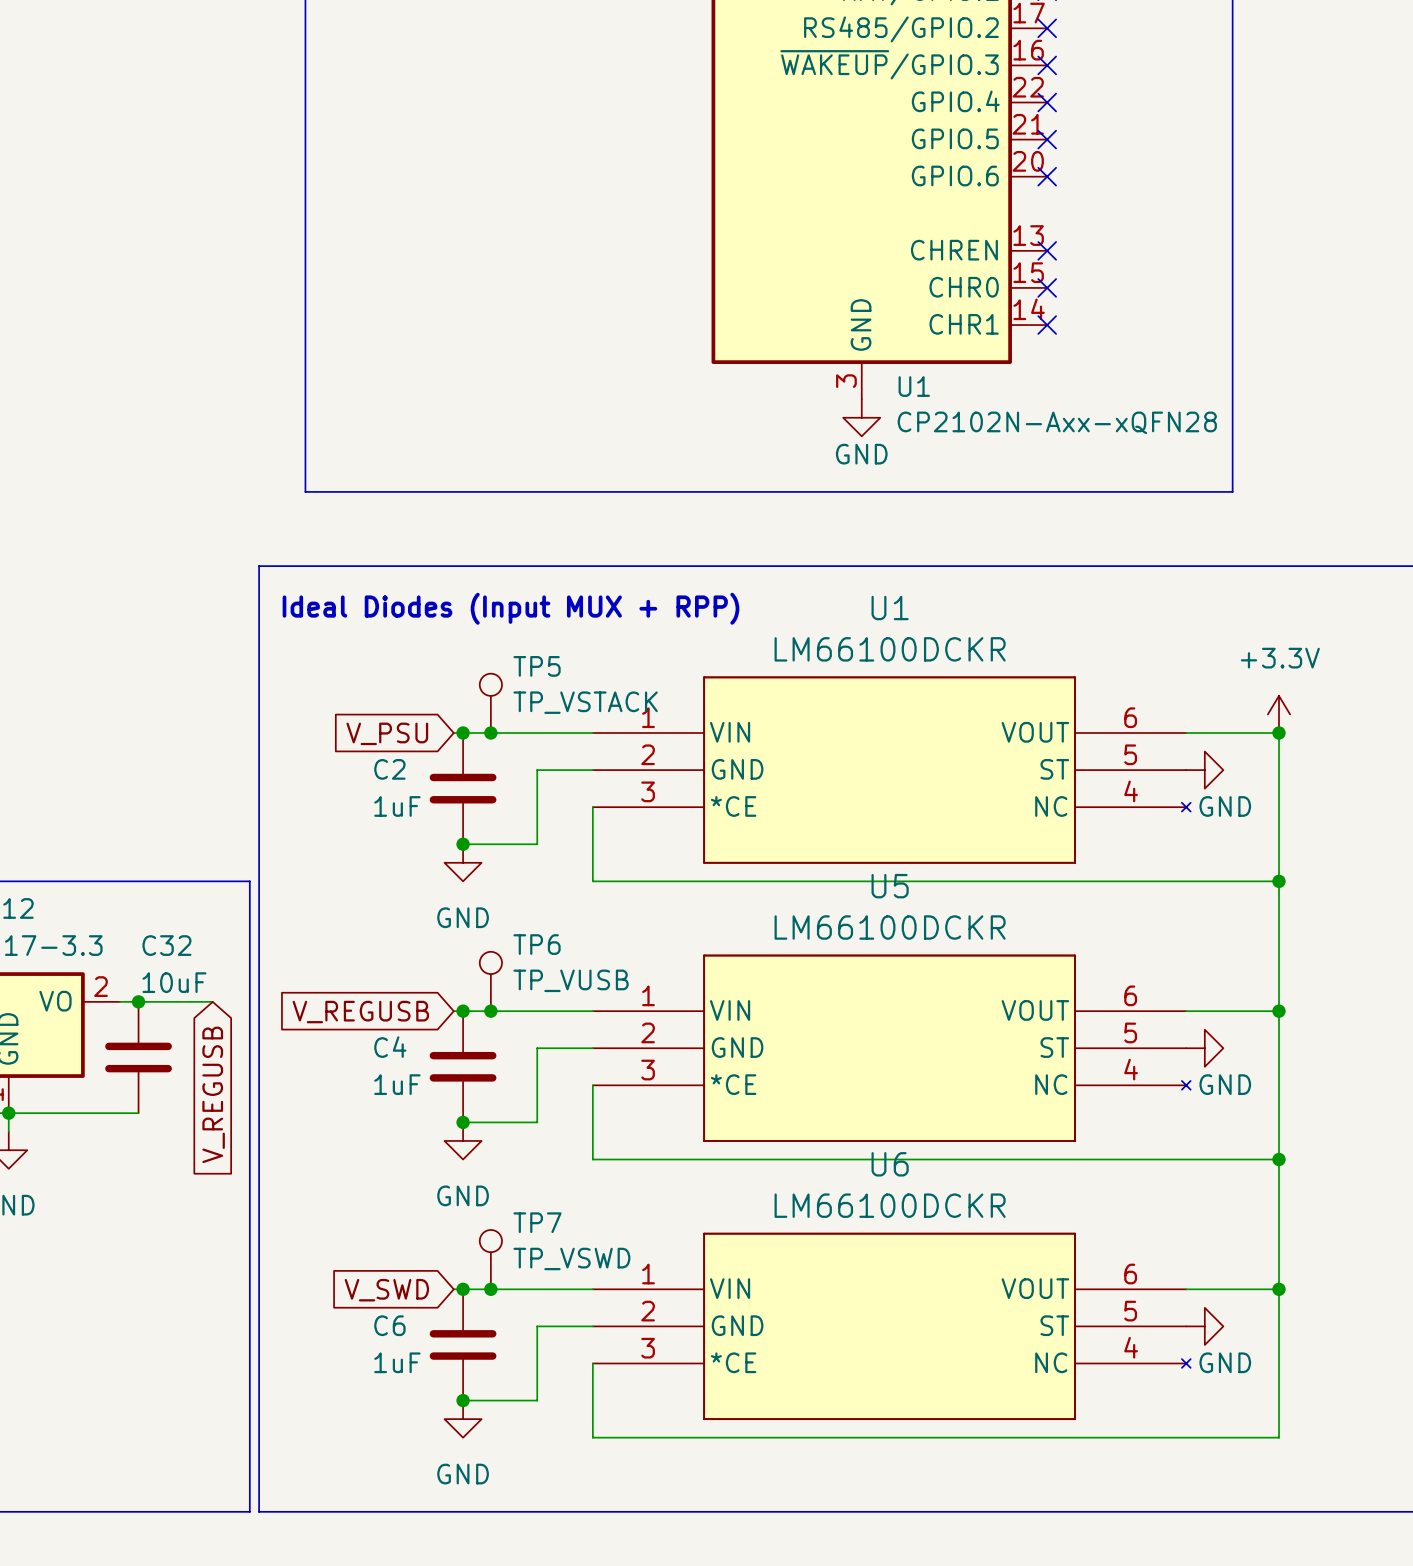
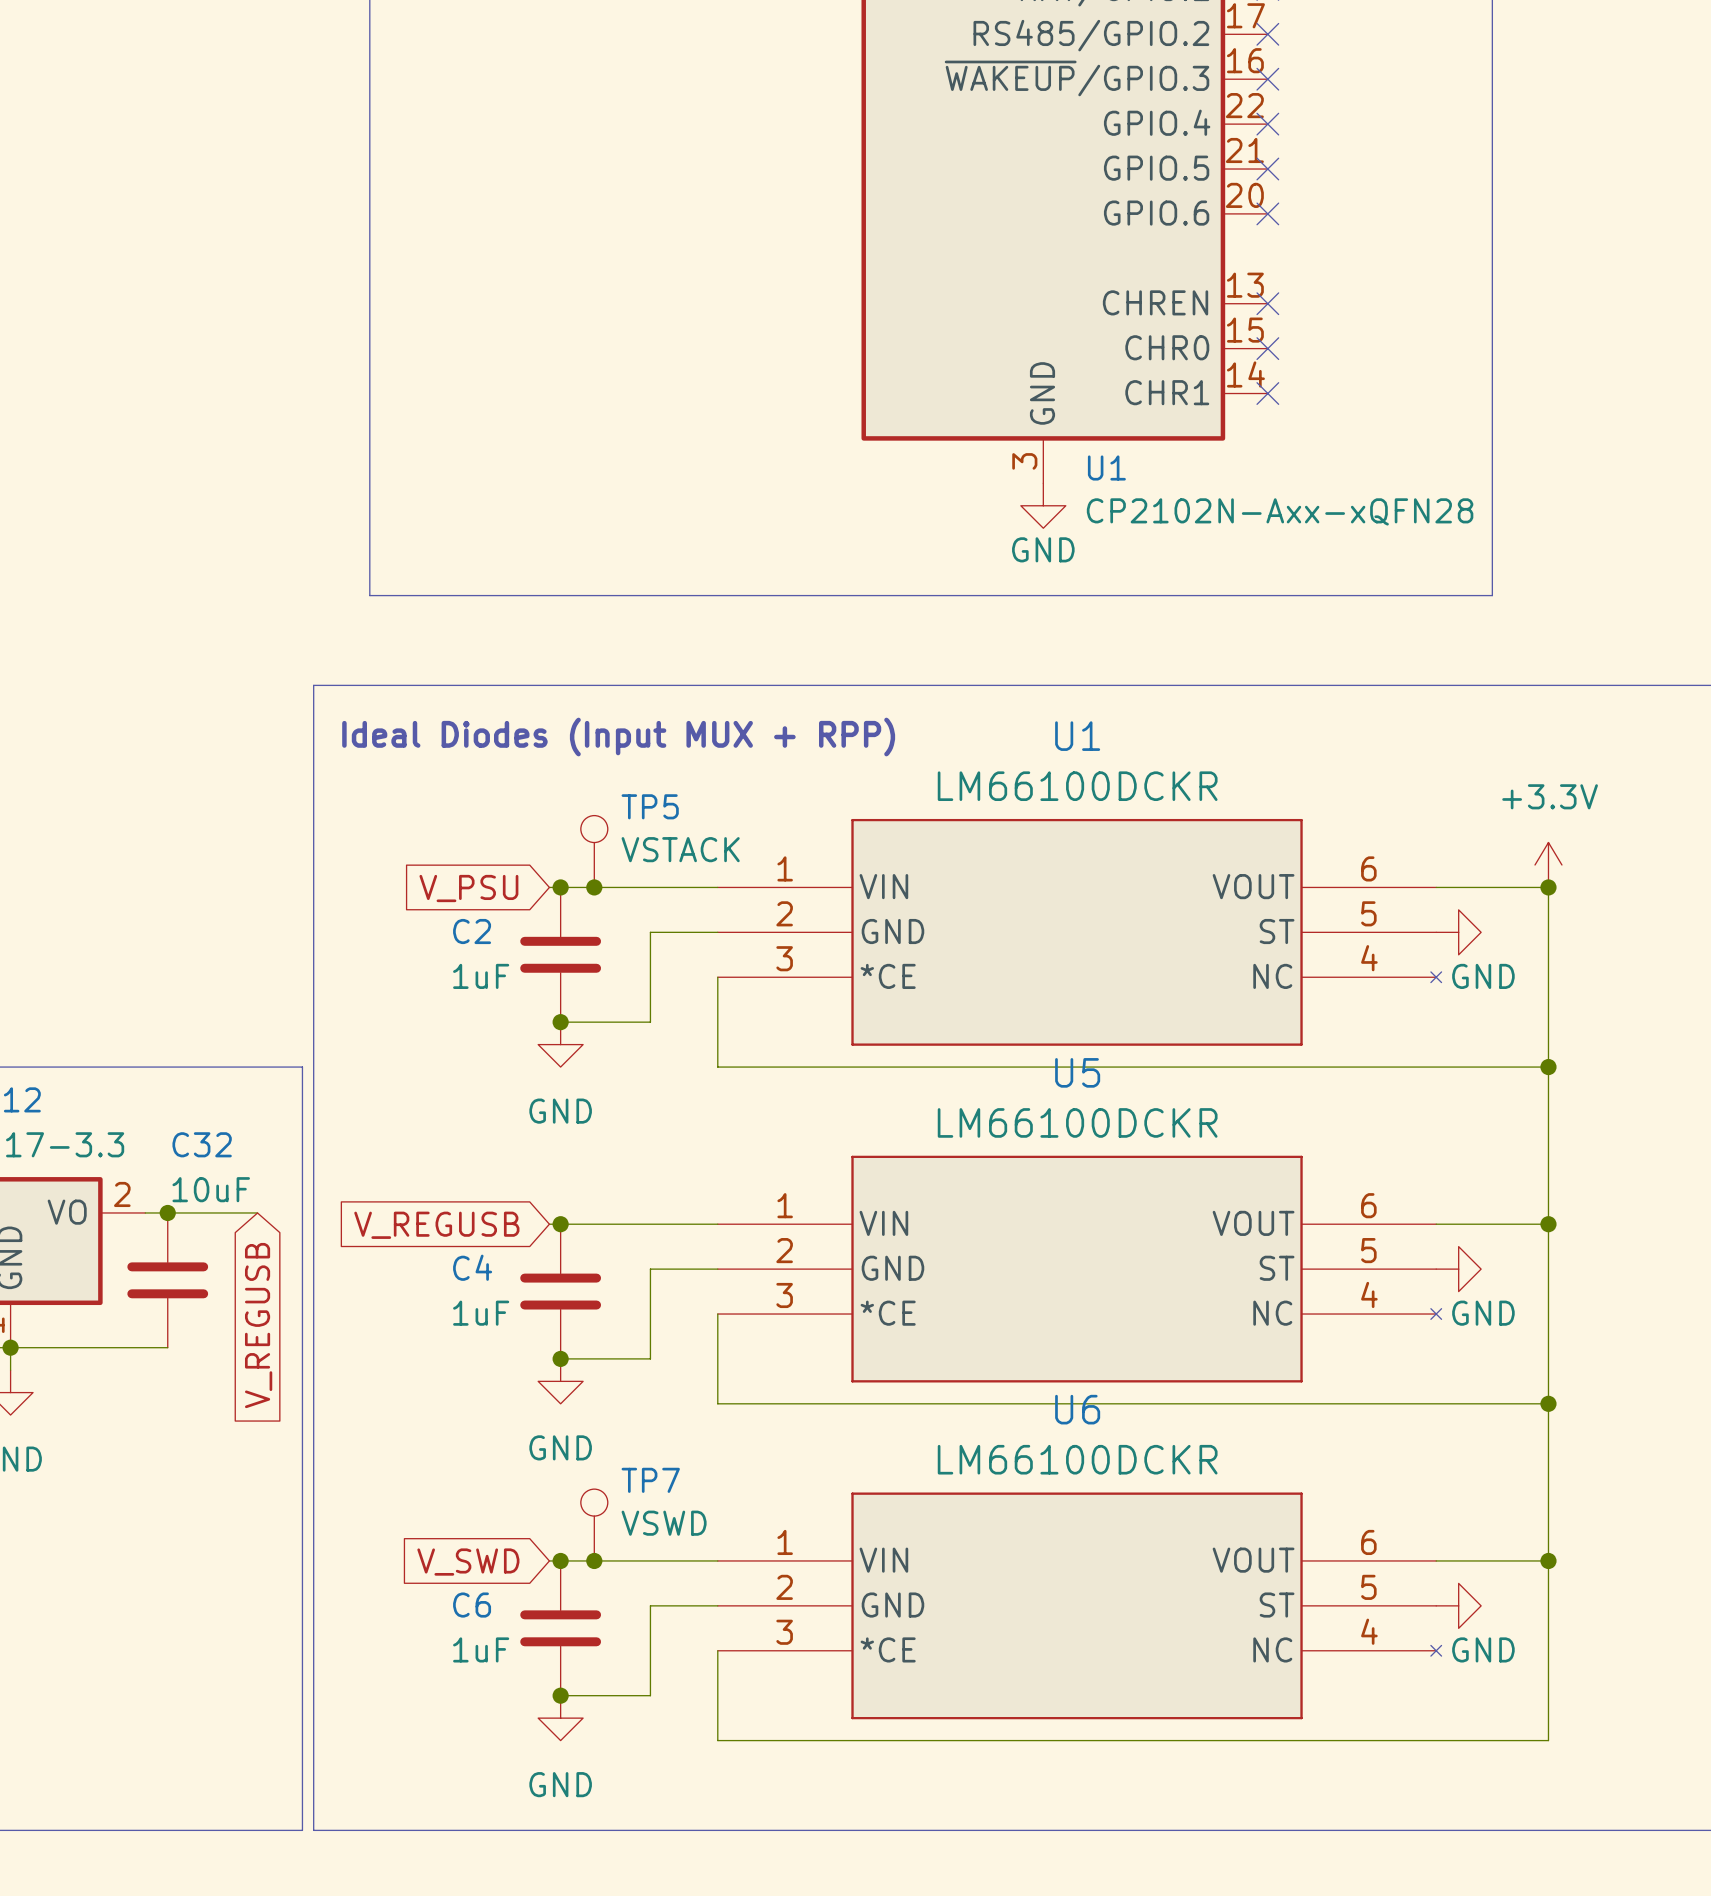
TP5 value: TP_VSTACK (585, 702) -> VSTACK (680, 849)
TP6: TP_VUSB (490, 981) -> none
junction: (490, 1011) -> none
TP7 value: TP_VSWD (571, 1258) -> VSWD (664, 1523)

